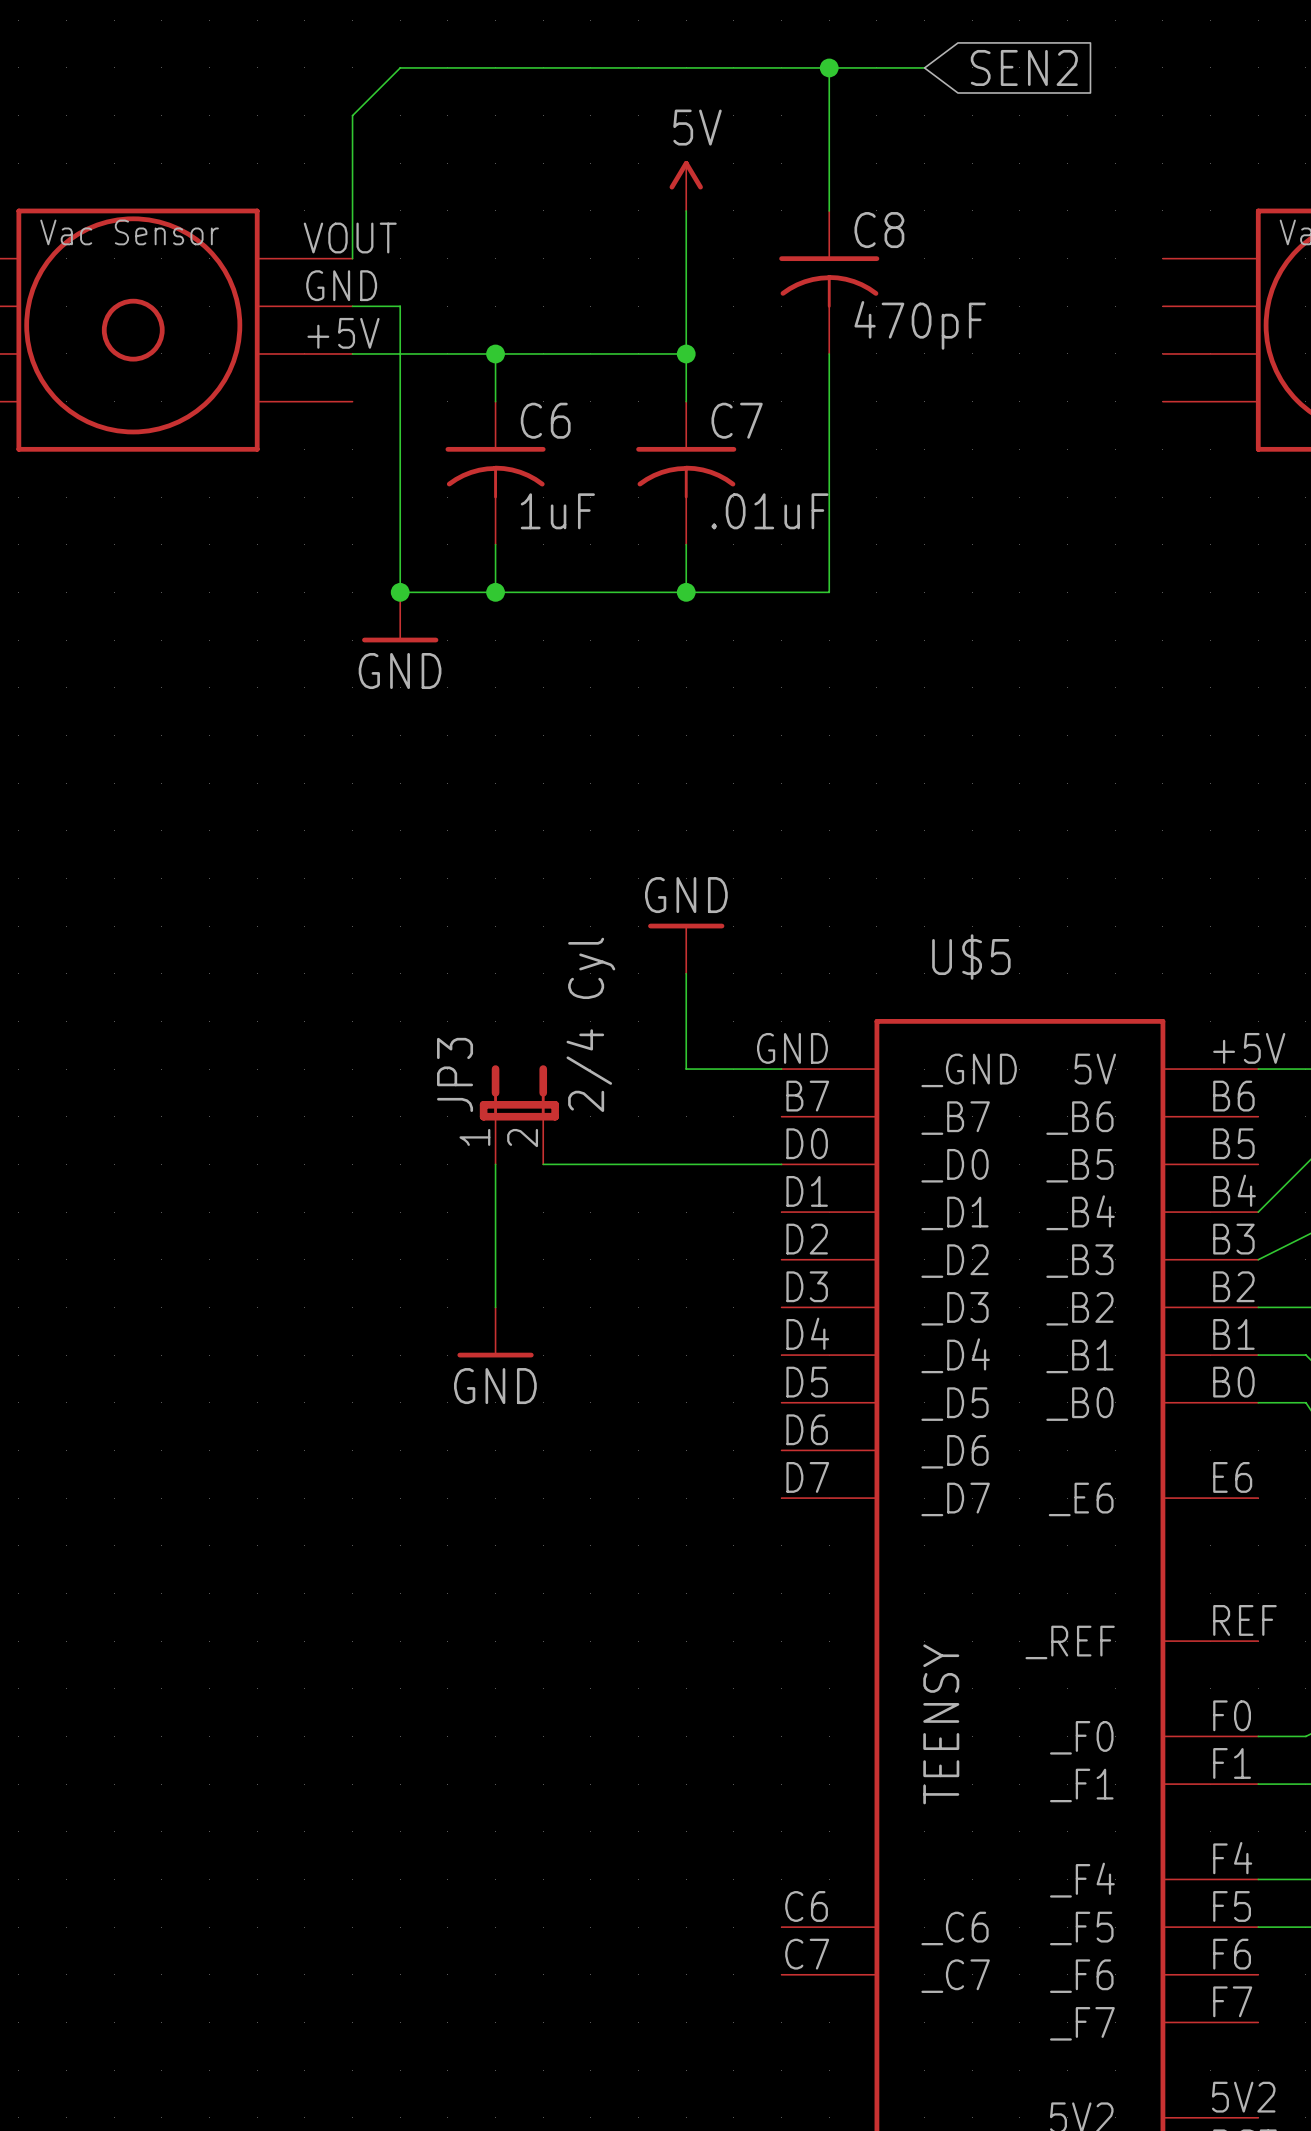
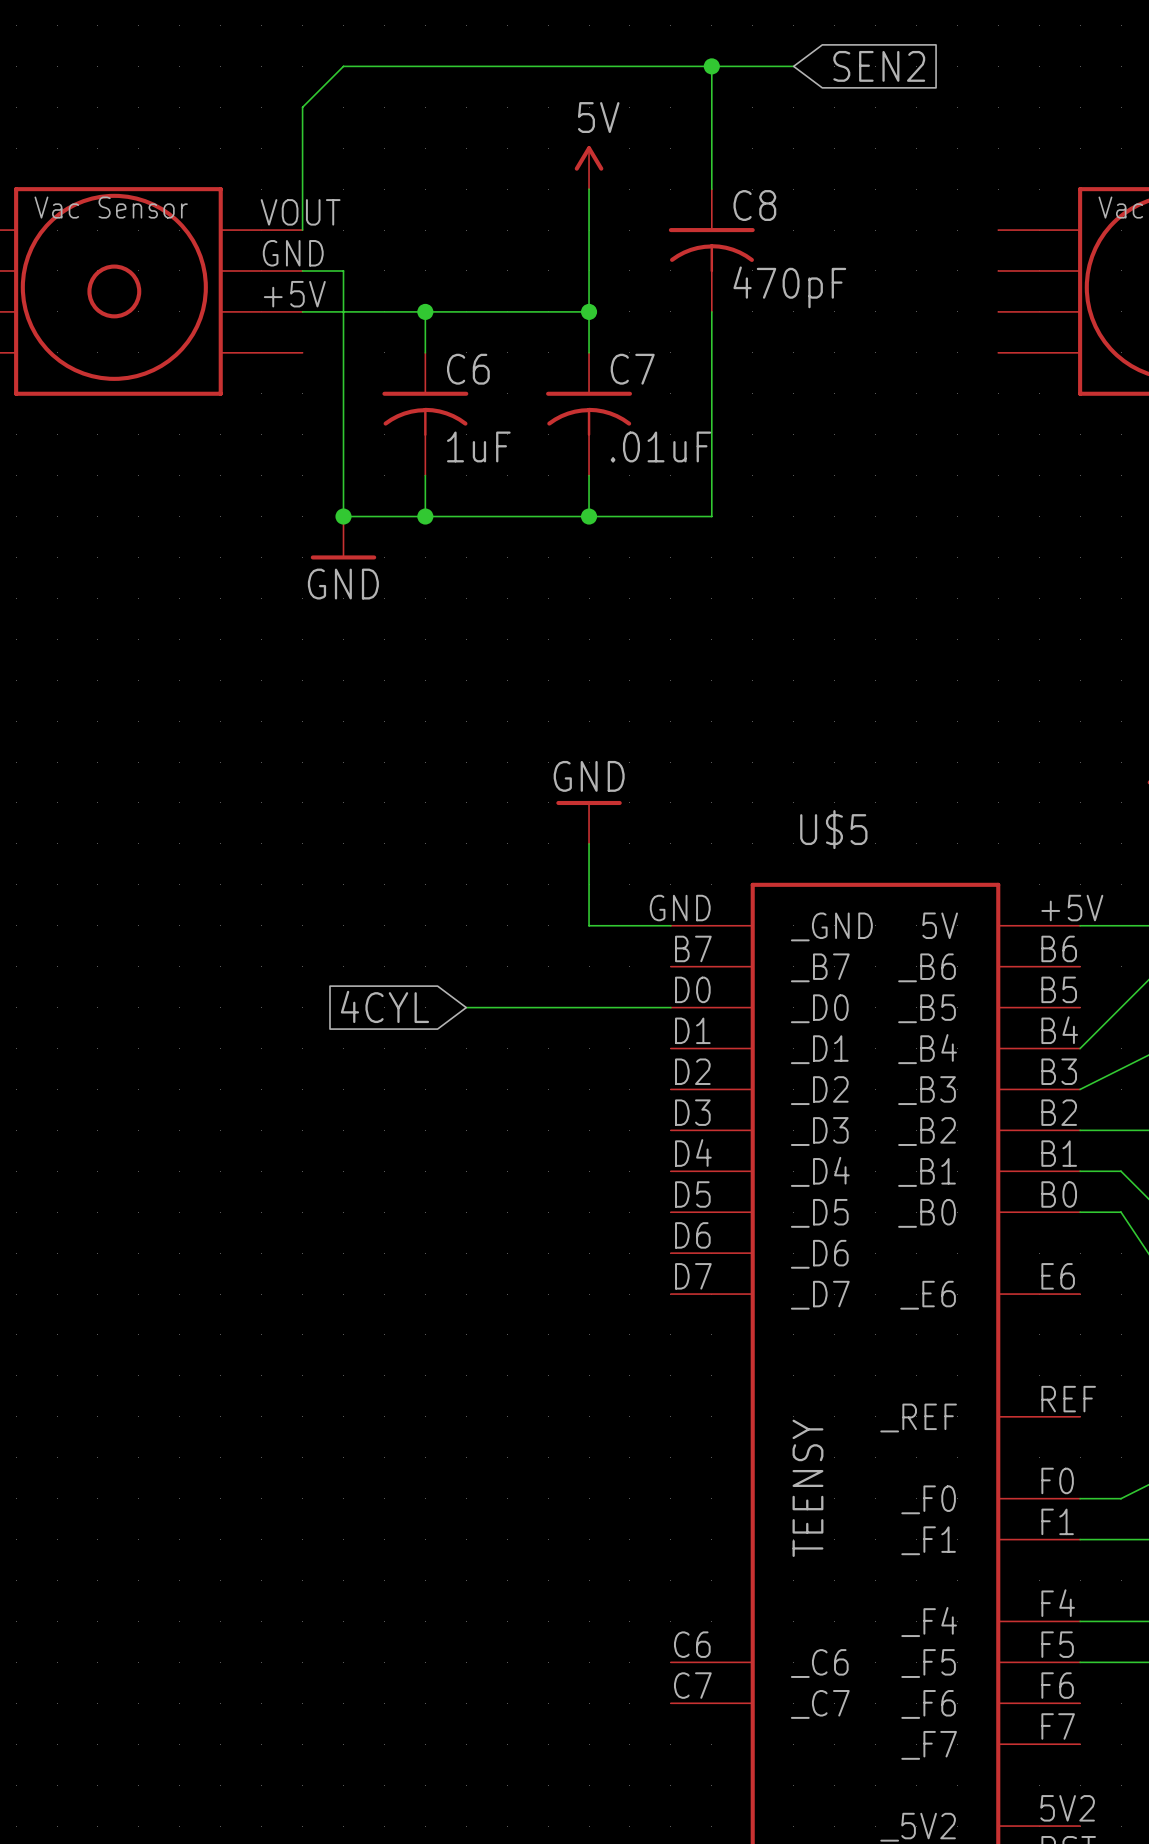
JP3: 2/4 Cyl (519, 1114) -> none
global label: none -> 4CYL (384, 1006)
wire: (495, 1164) (495, 1307) -> none
power symbol: GND (495, 1332) -> none

